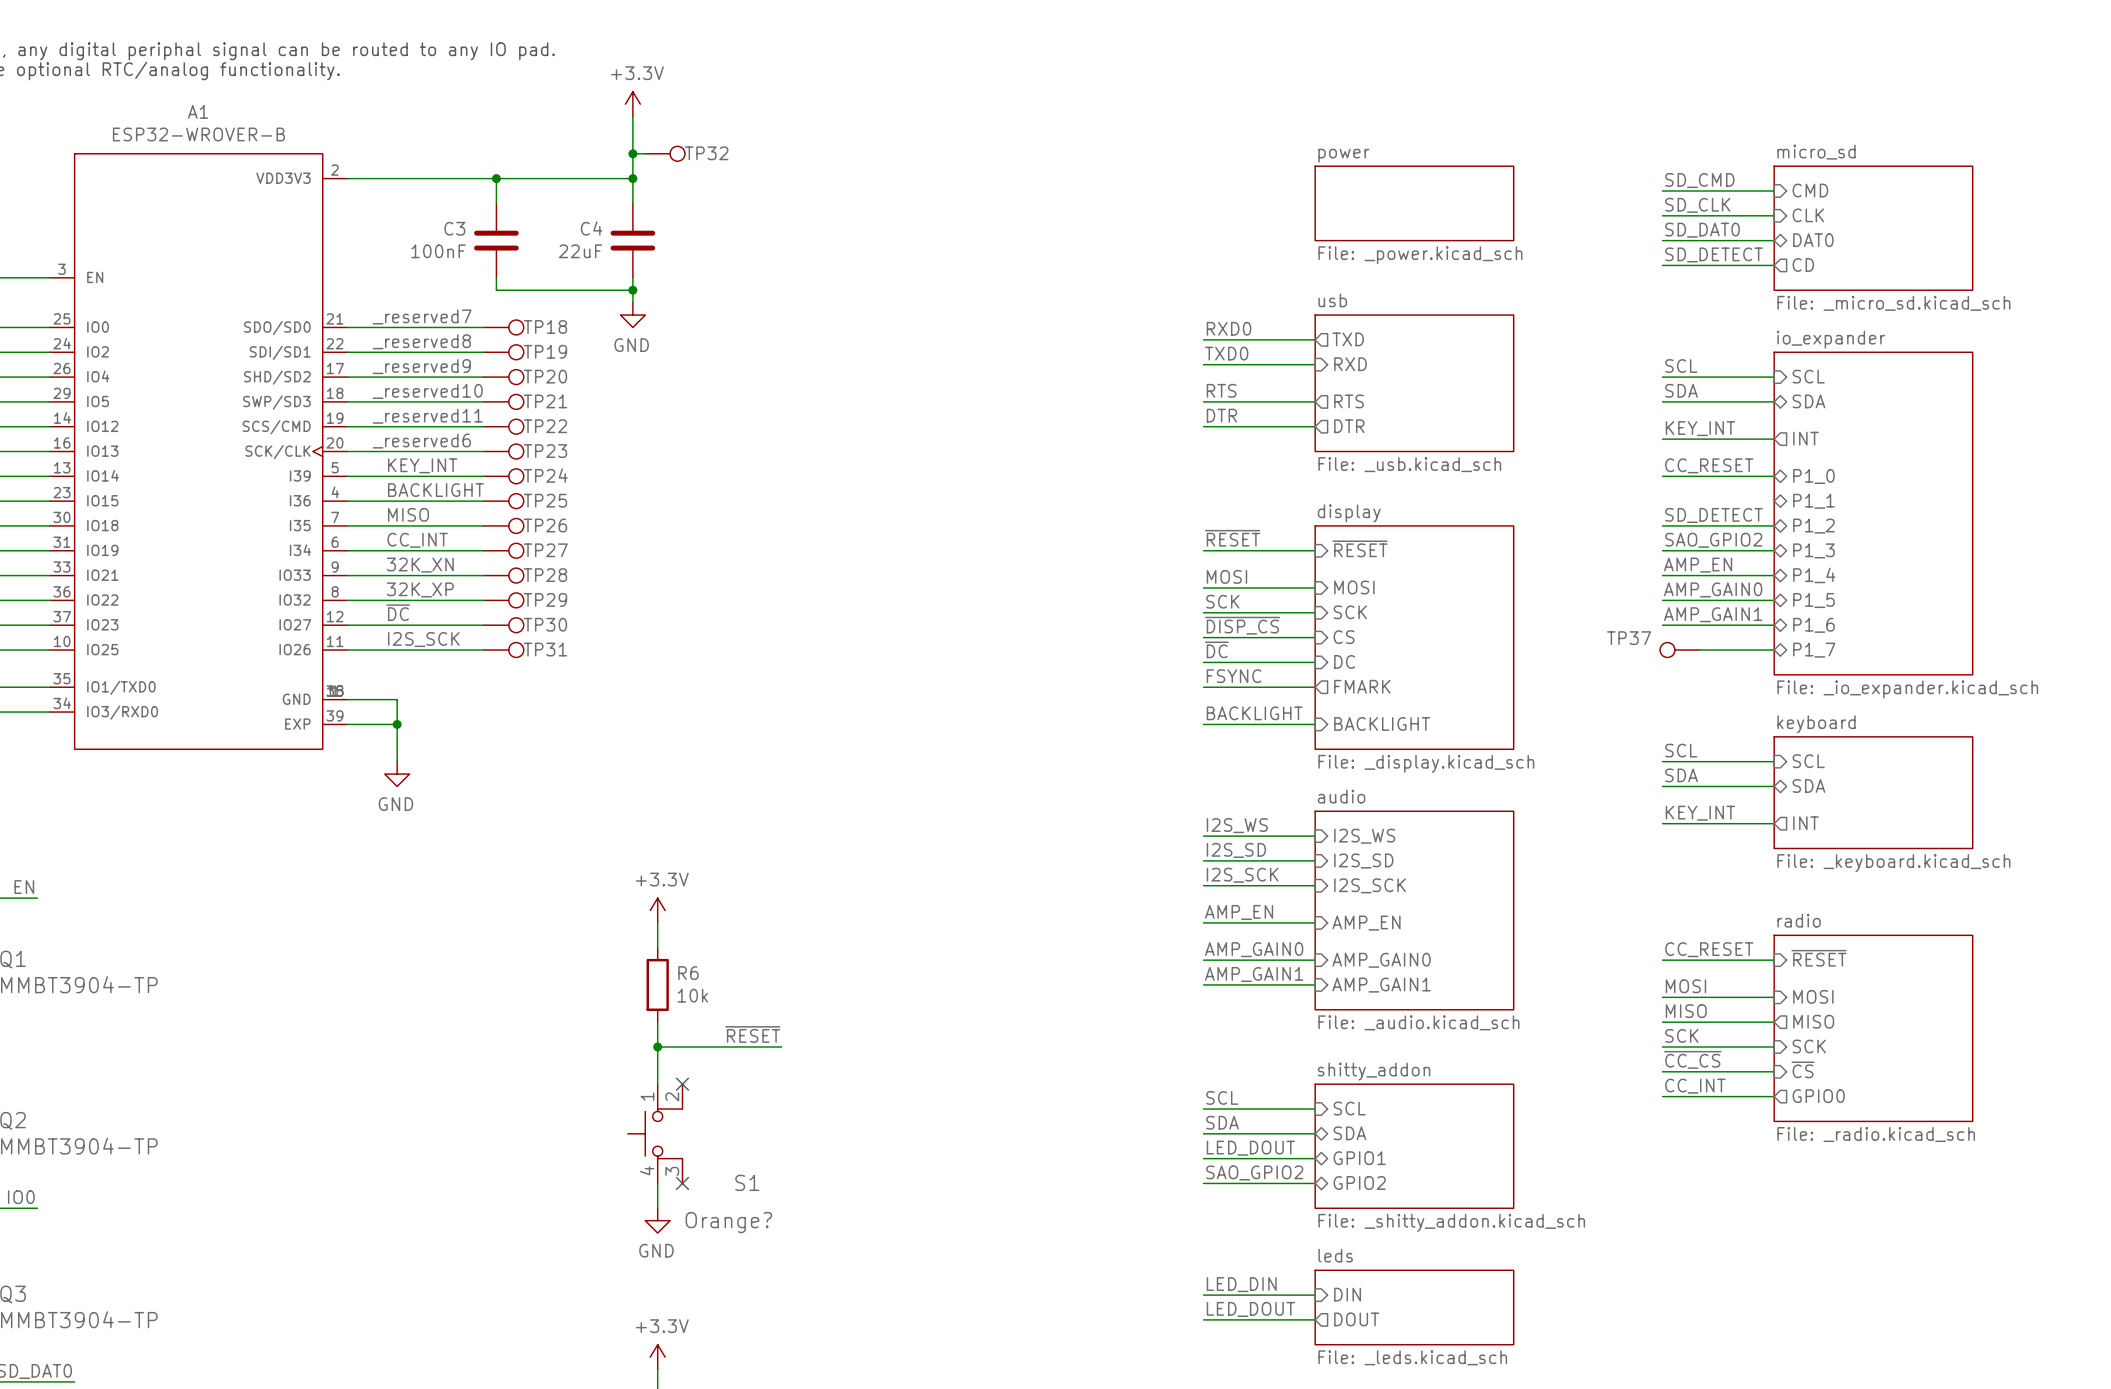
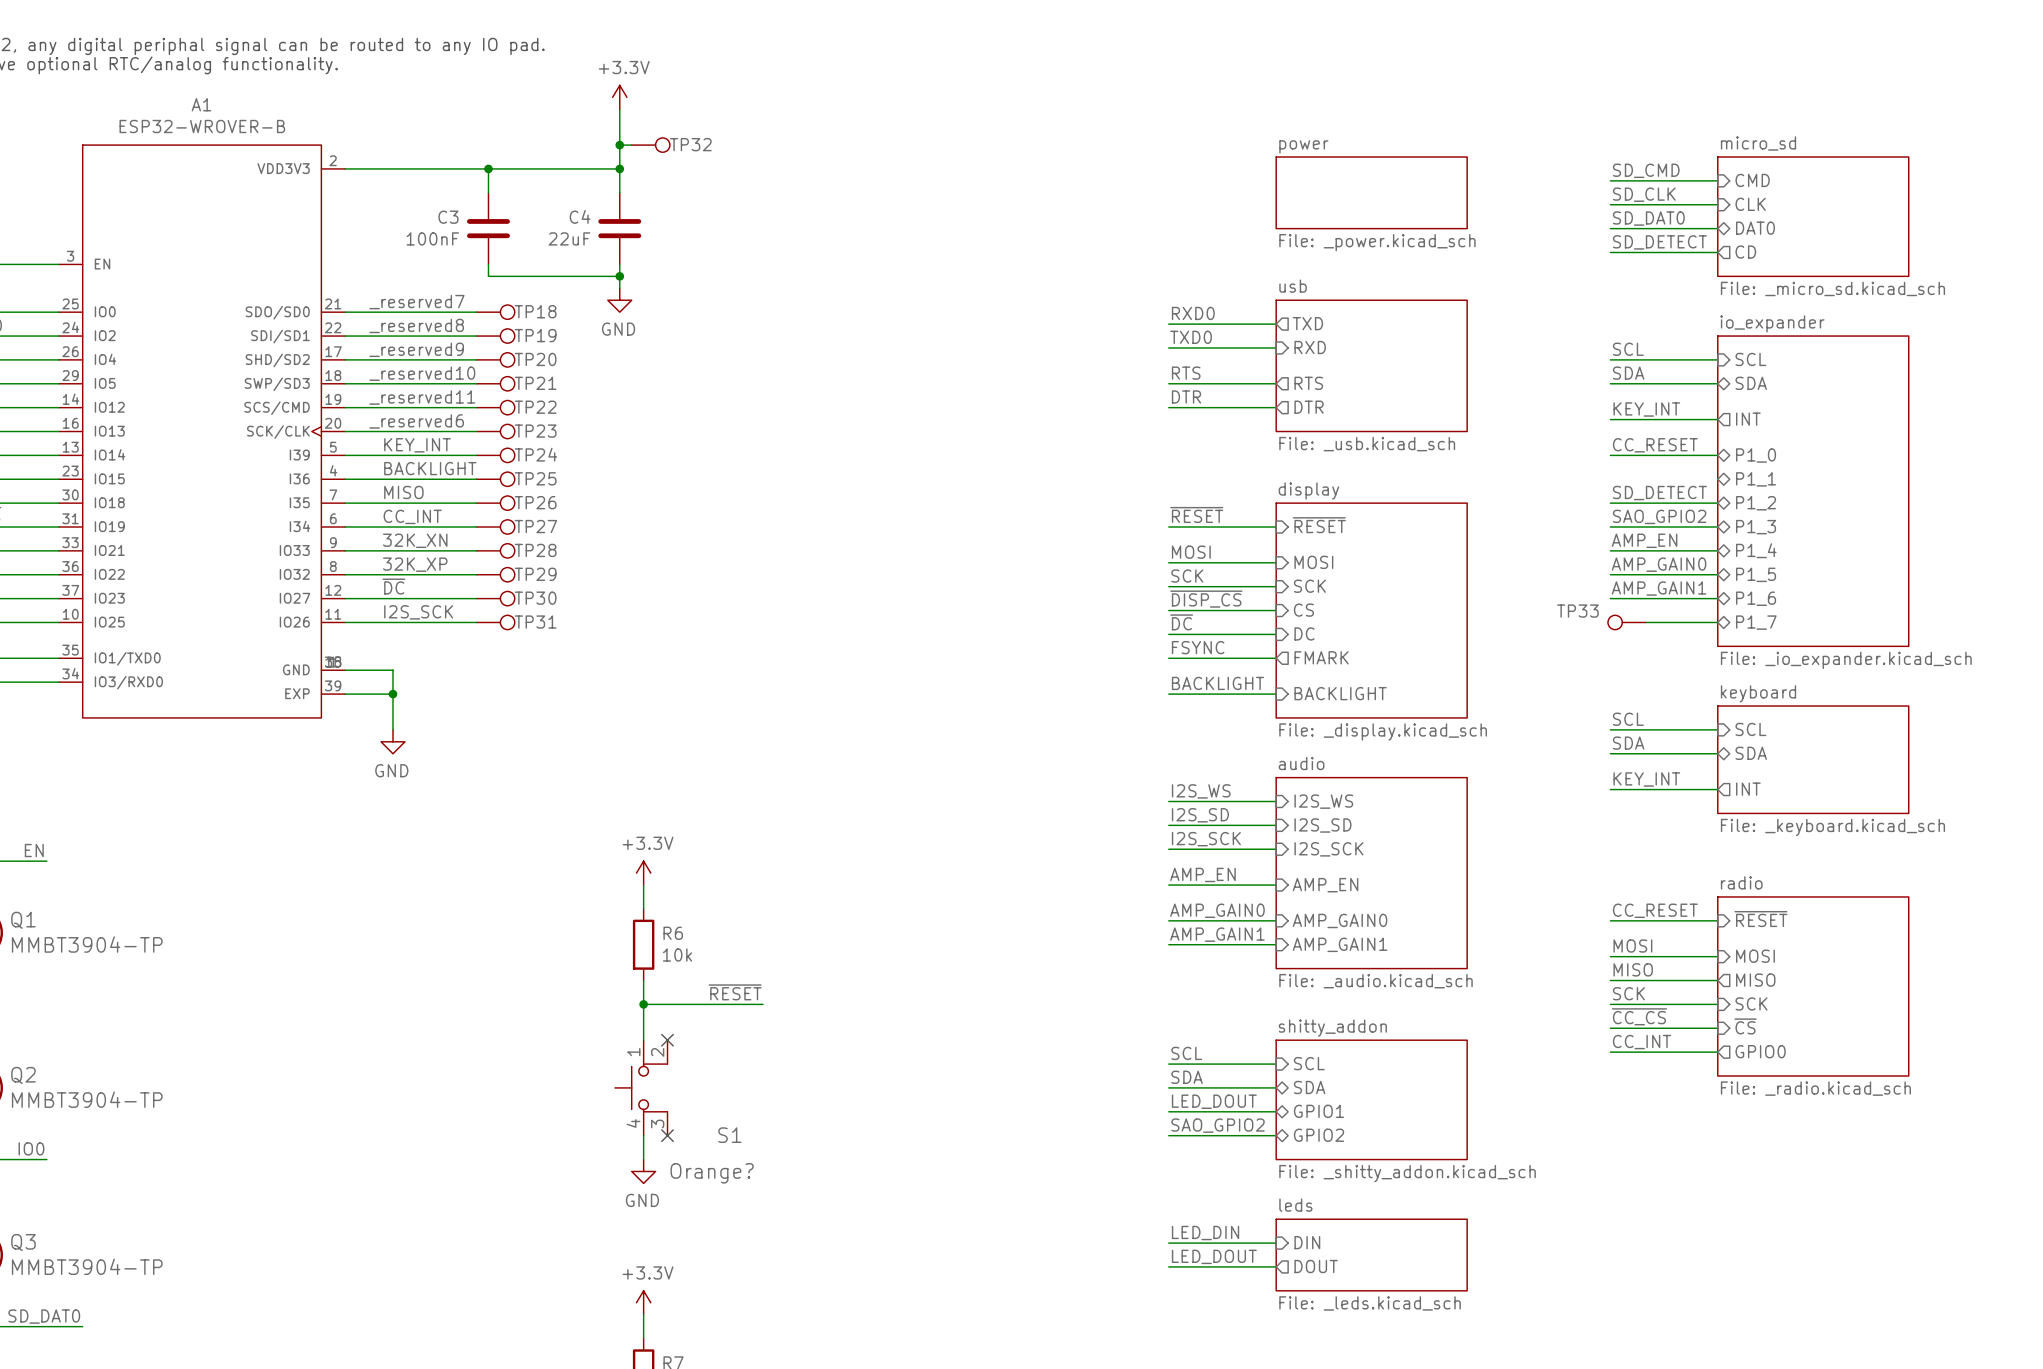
TP37 name: TP37 (1629, 638) -> TP33 (1577, 611)

